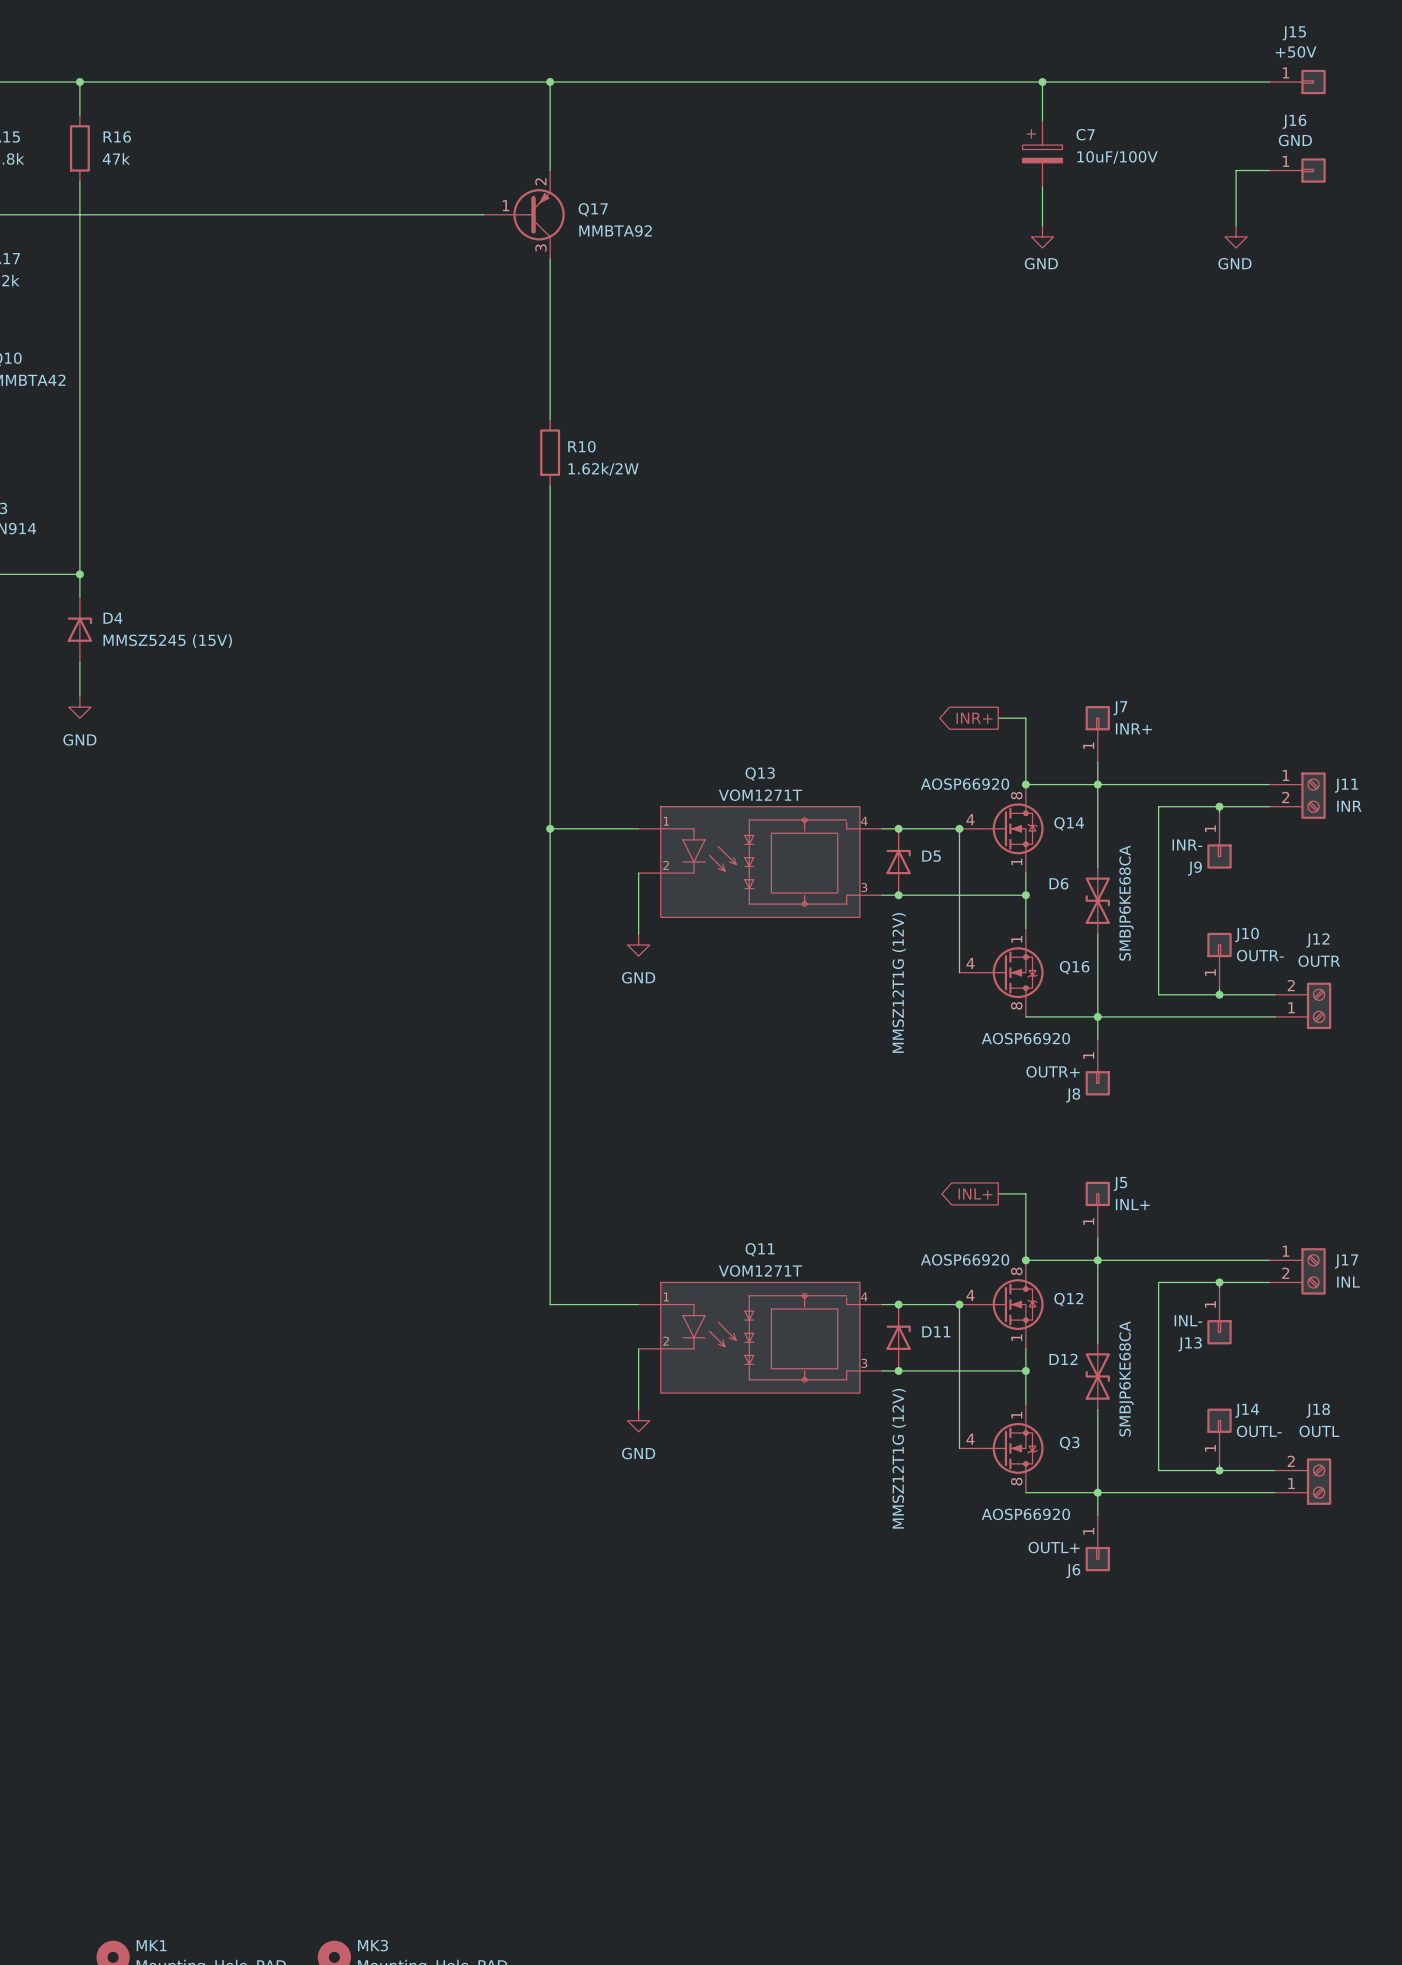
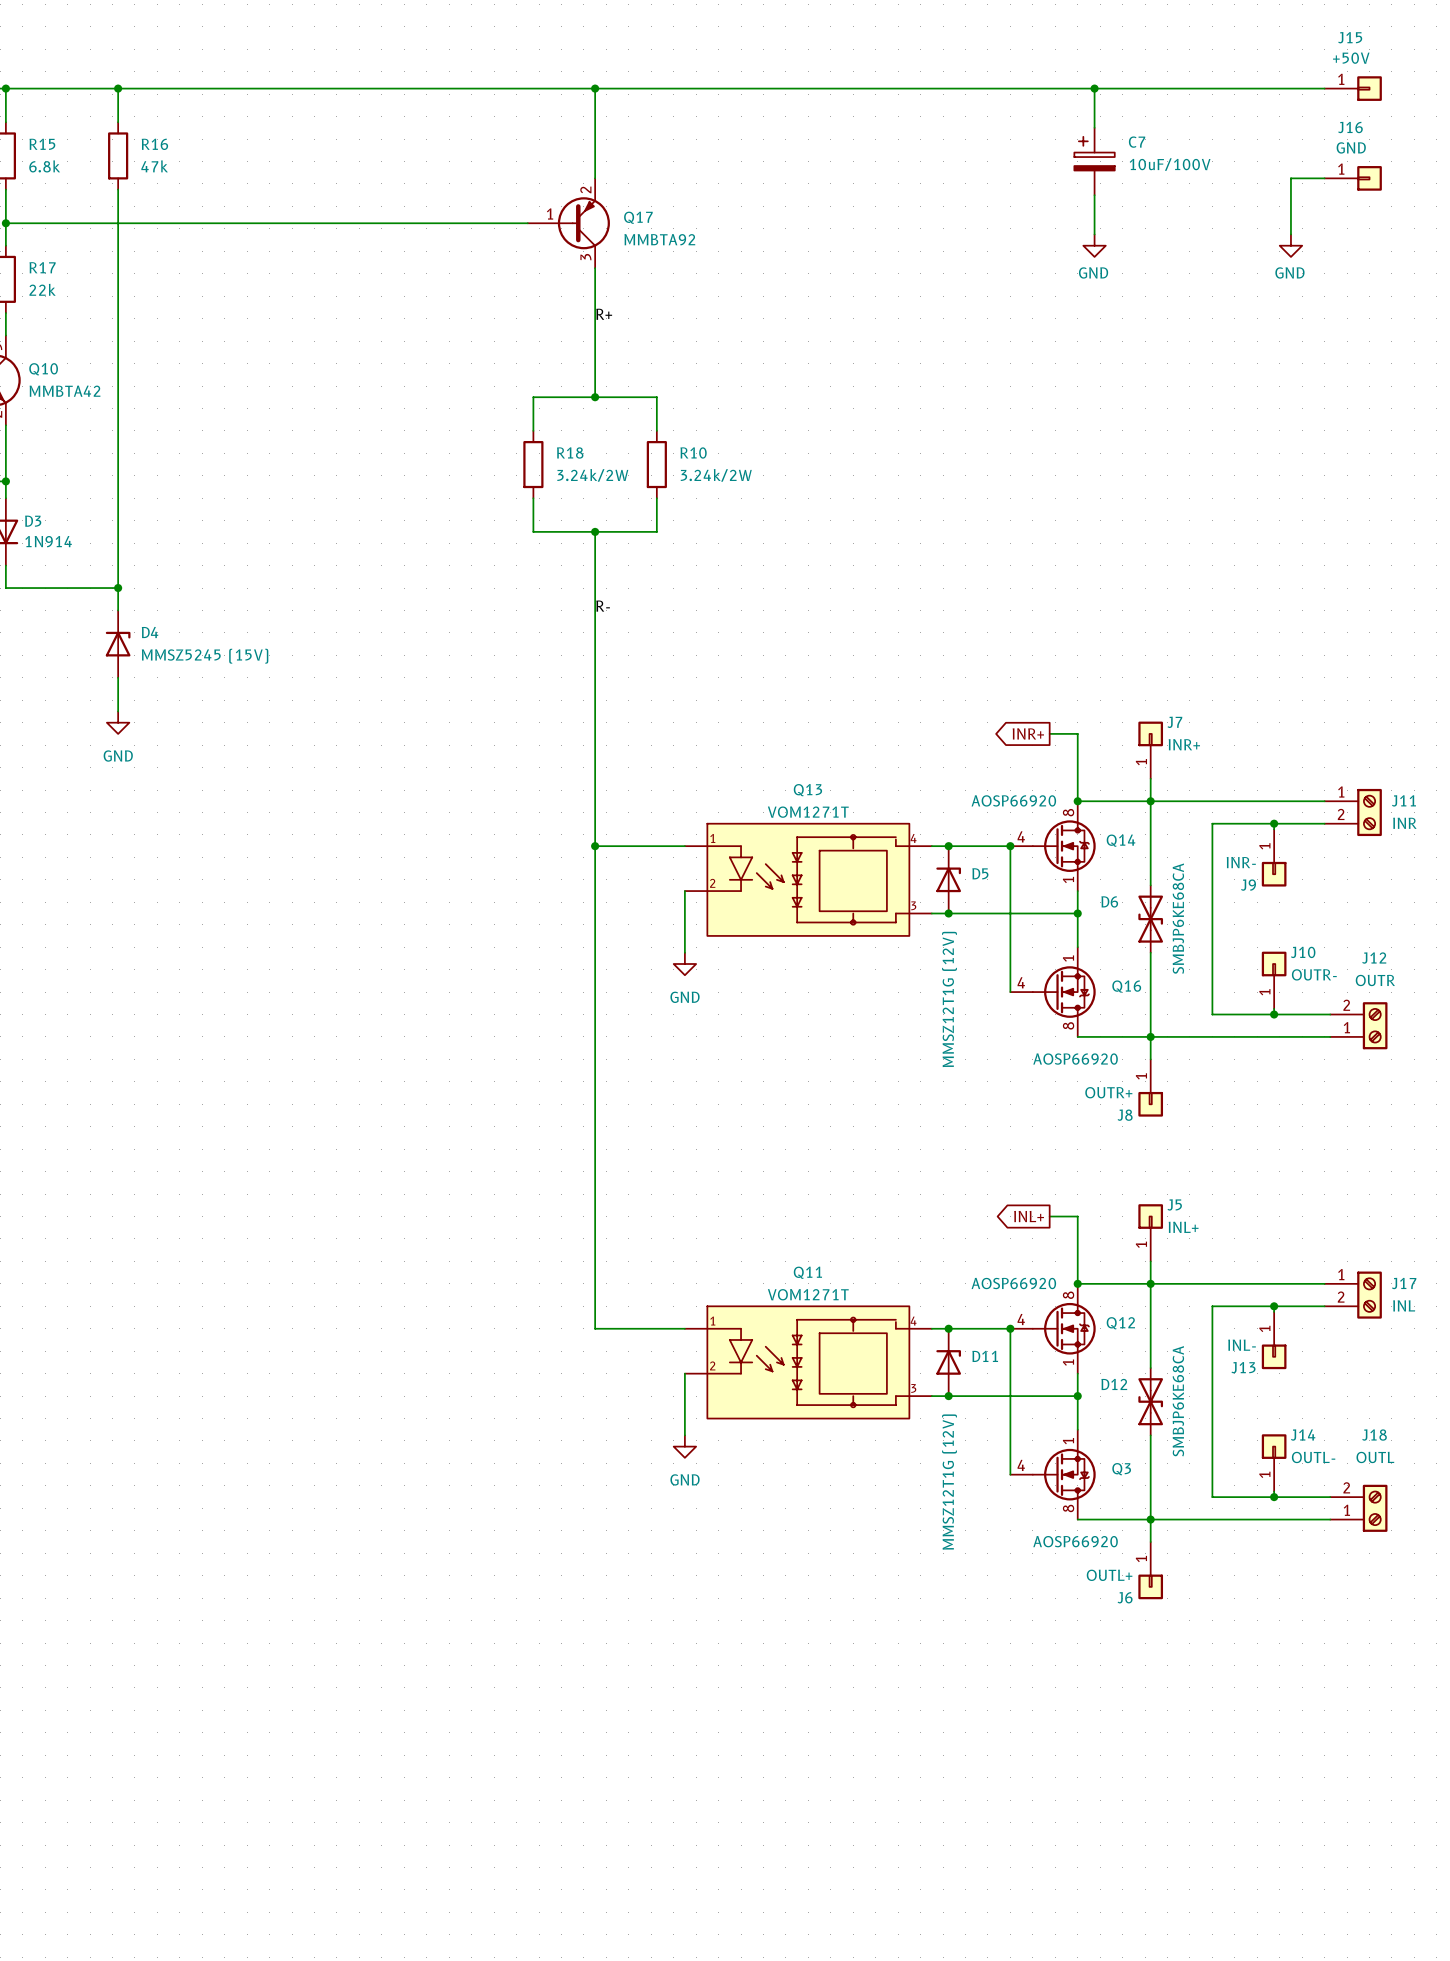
label: none -> R+ (604, 314)
wire: (550, 386) (550, 419) -> none
junction: none -> (595, 397)
wire: none -> (533, 430) (533, 397) (656, 397) (656, 430)
R10 name position: R10 (581, 446) -> R10 (693, 452)
R18: none -> 3.24k/2W (533, 464)
R10 position: (550, 452) -> (656, 464)
R10 value: 1.62k/2W (603, 469) -> 3.24k/2W (716, 475)
wire: none -> (533, 498) (533, 531) (656, 531) (656, 498)
wire: (550, 485) (550, 519) -> none
junction: none -> (595, 531)
label: none -> R- (603, 606)

